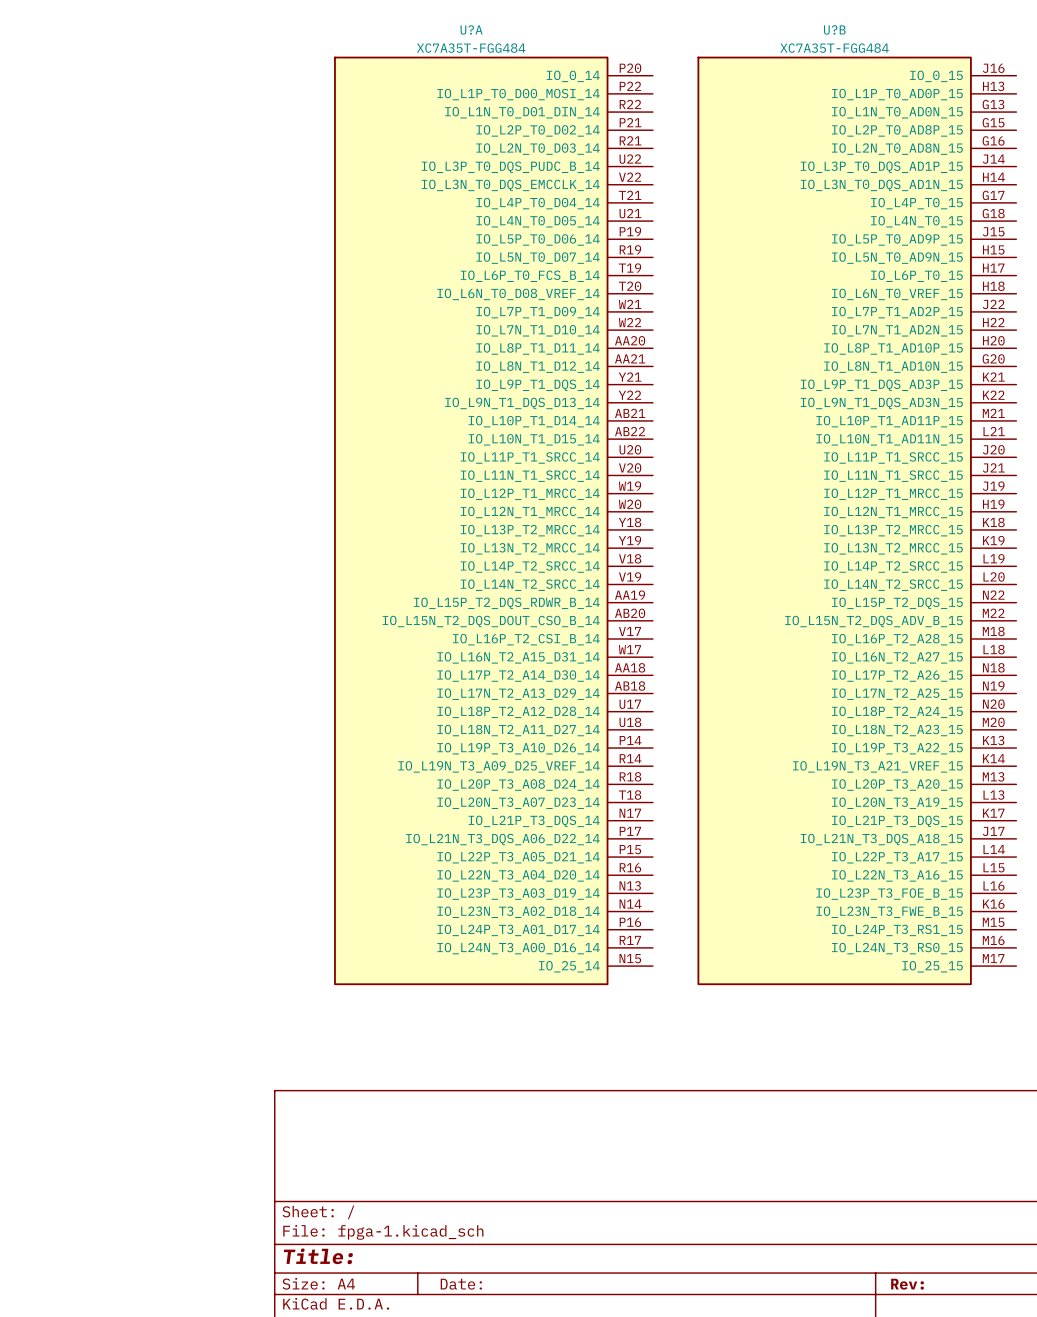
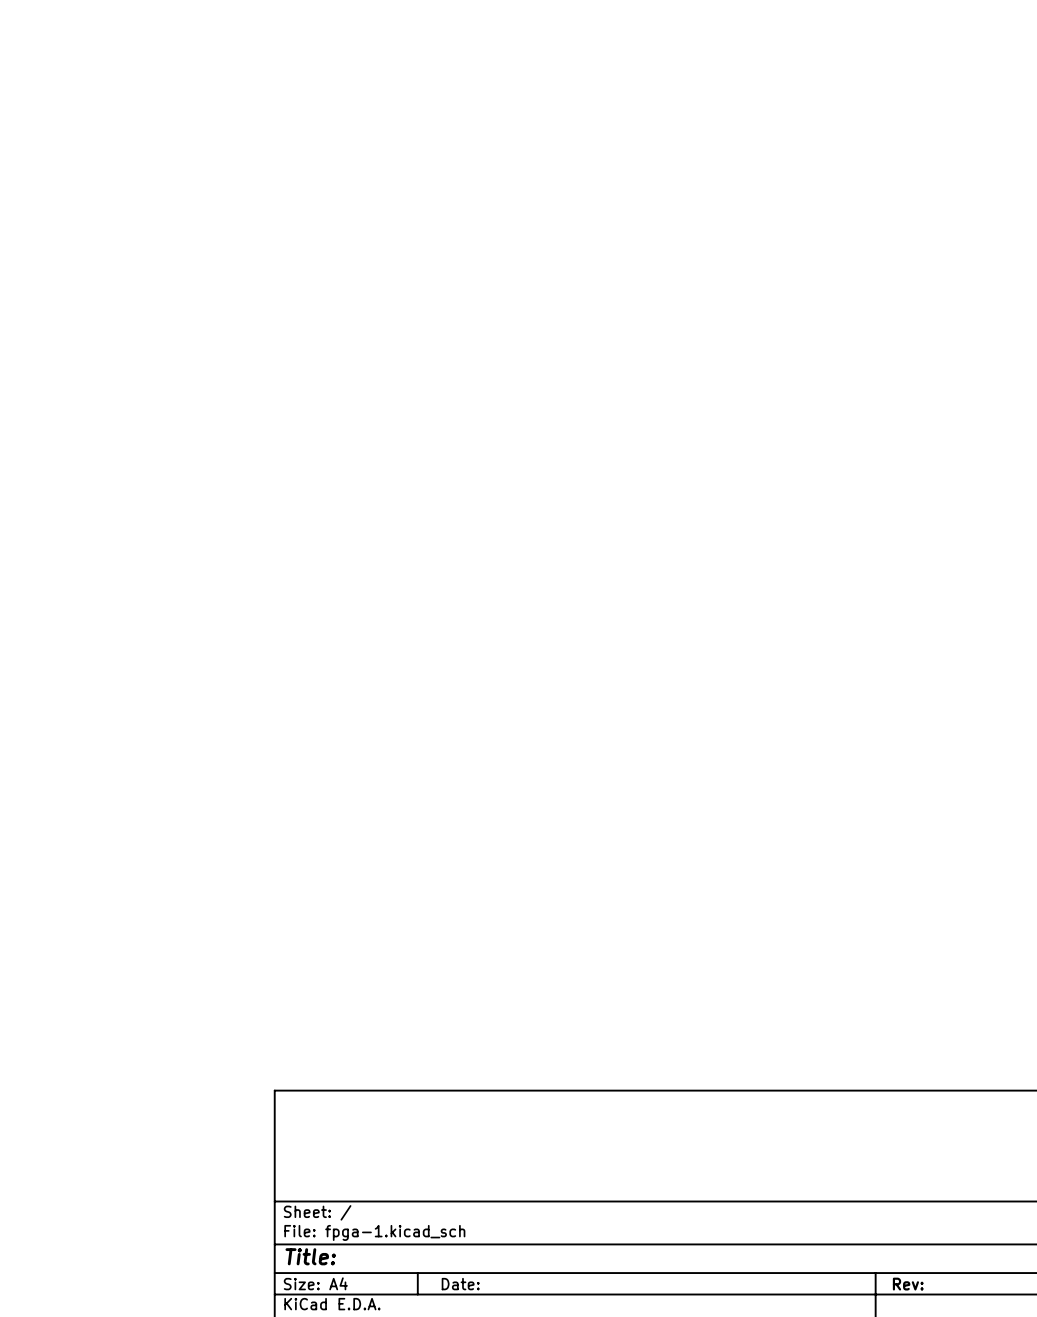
U?A: XC7A35T-FGG484 (493, 520) -> none
U?B: XC7A35T-FGG484 (856, 520) -> none

